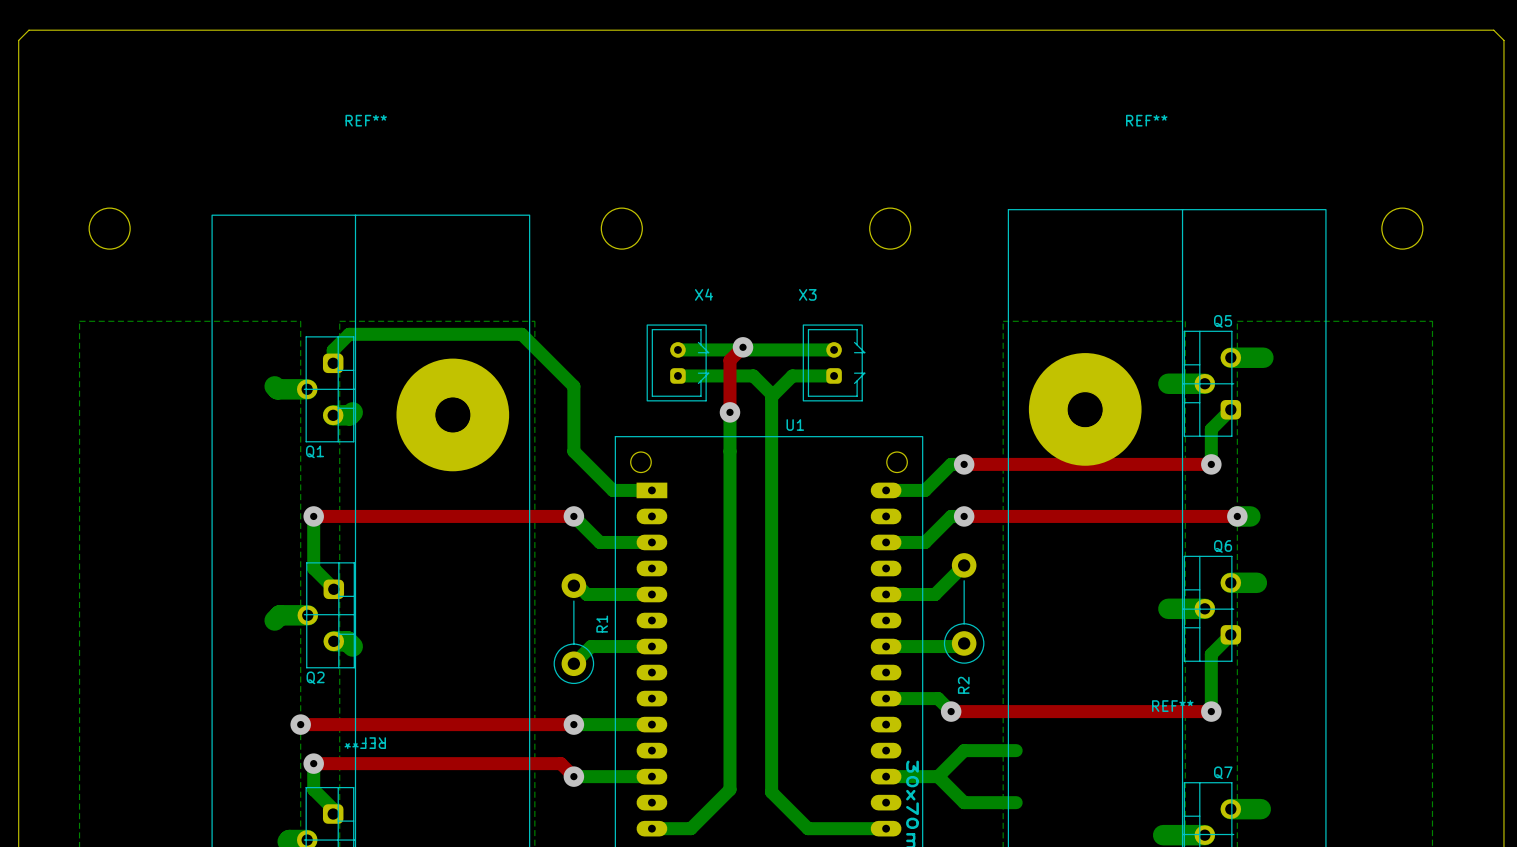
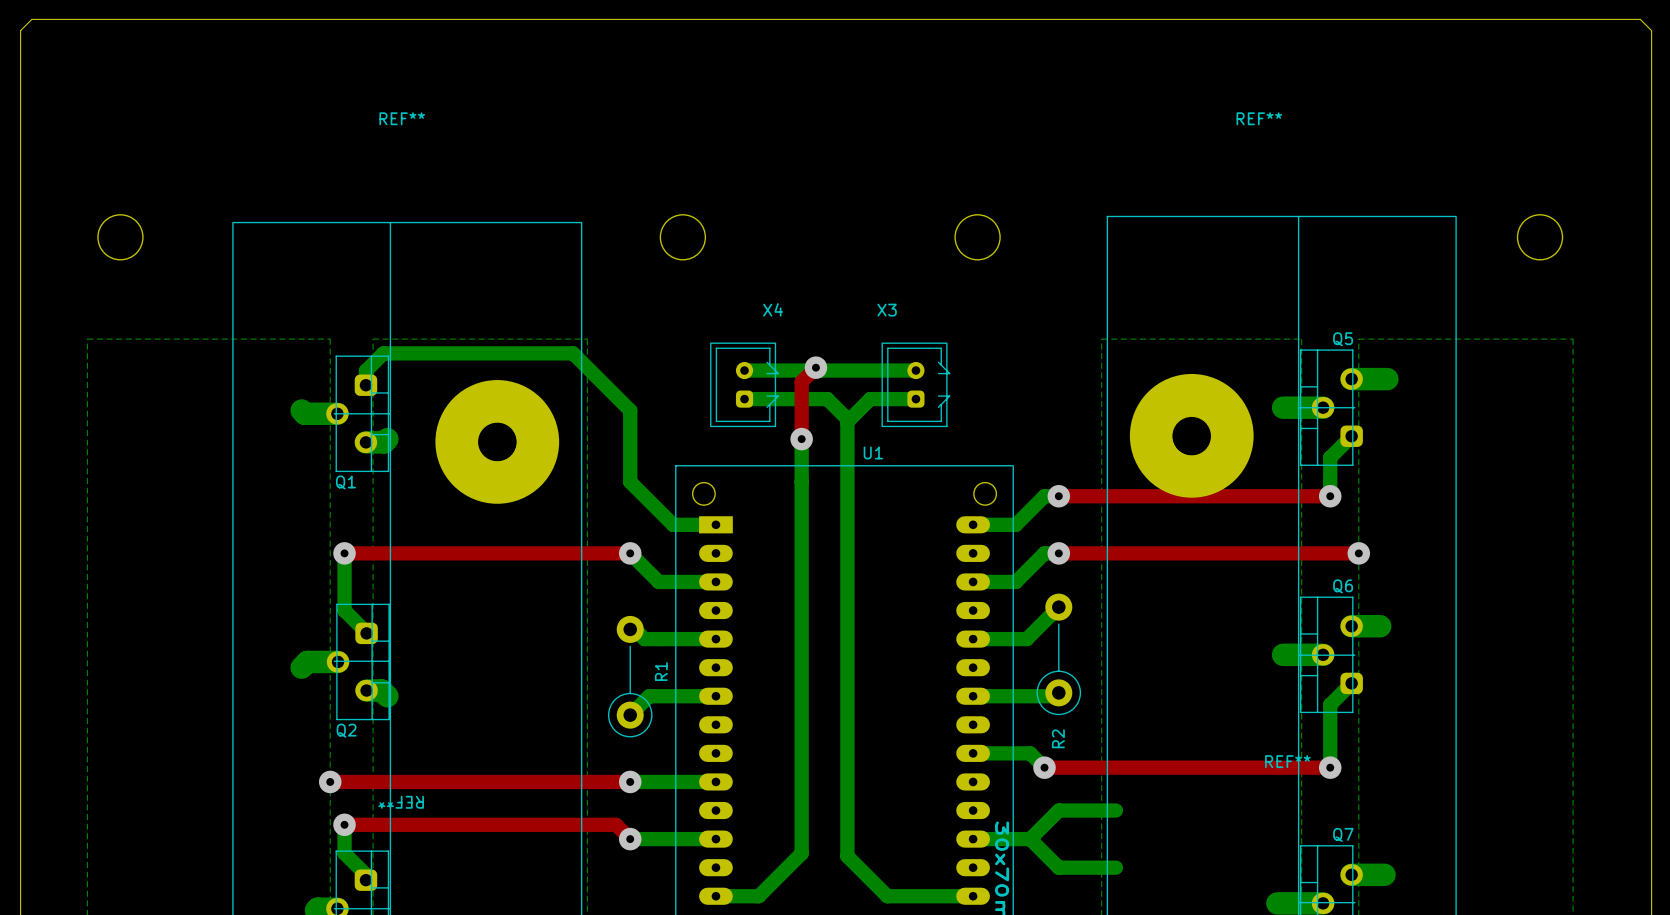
bottom track: (1237, 516) (1250, 516) -> none

